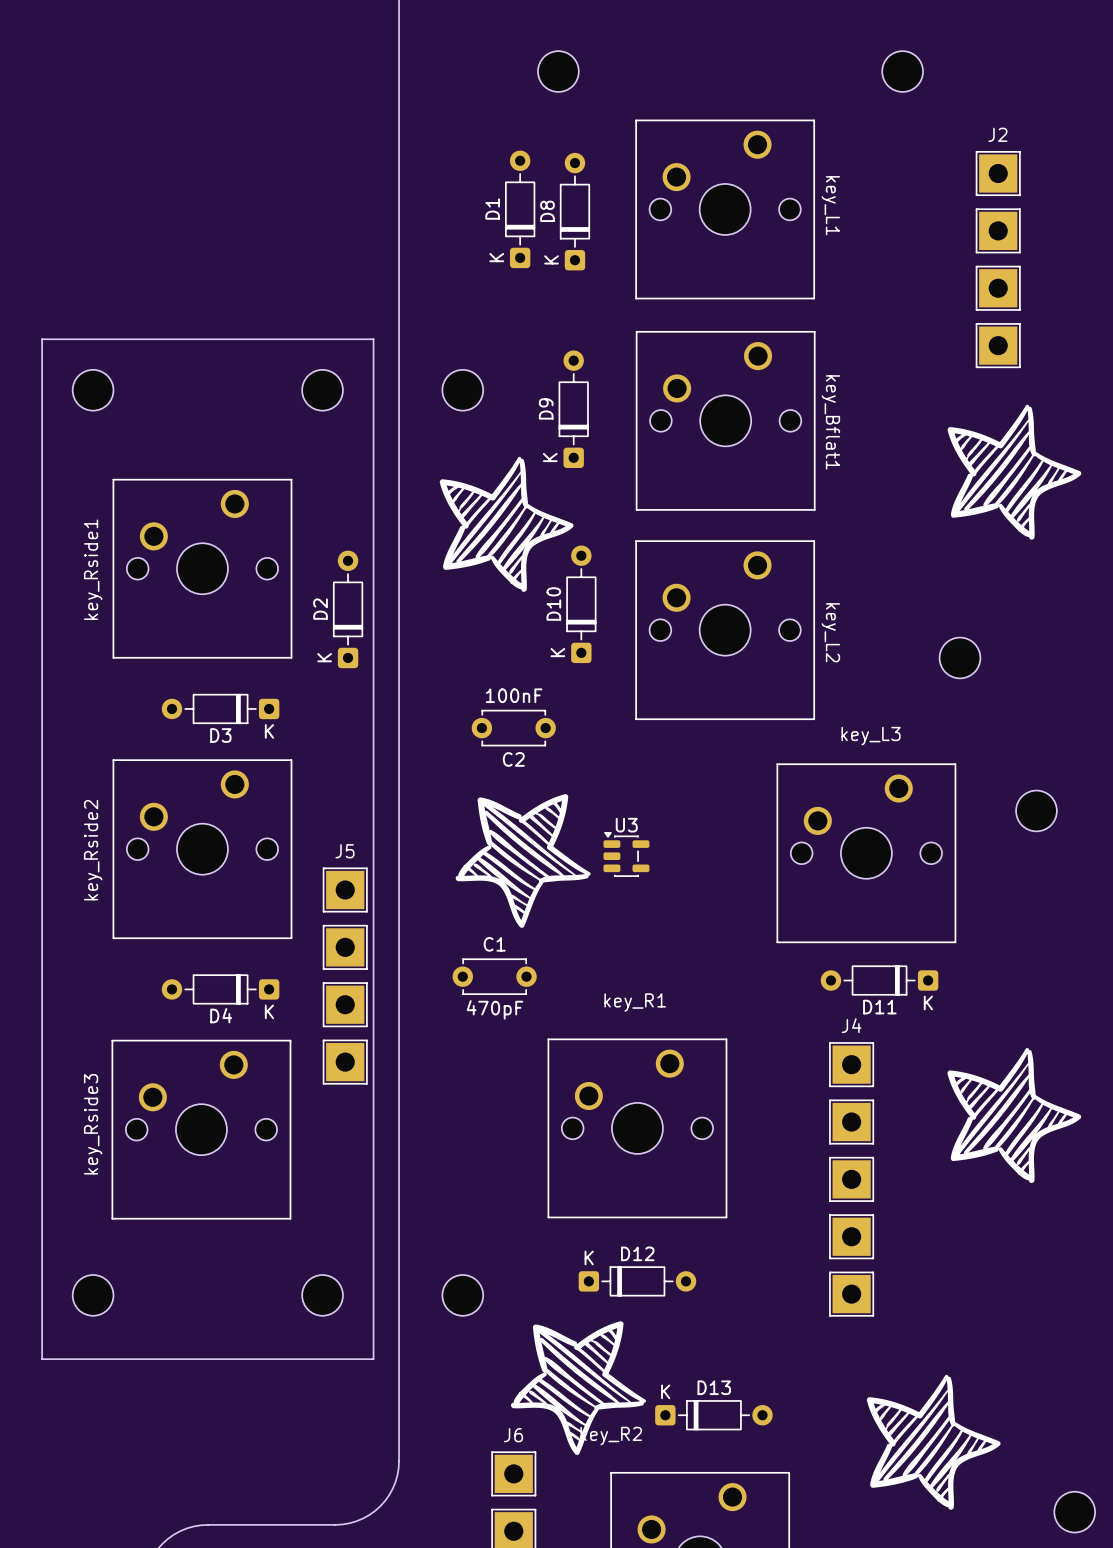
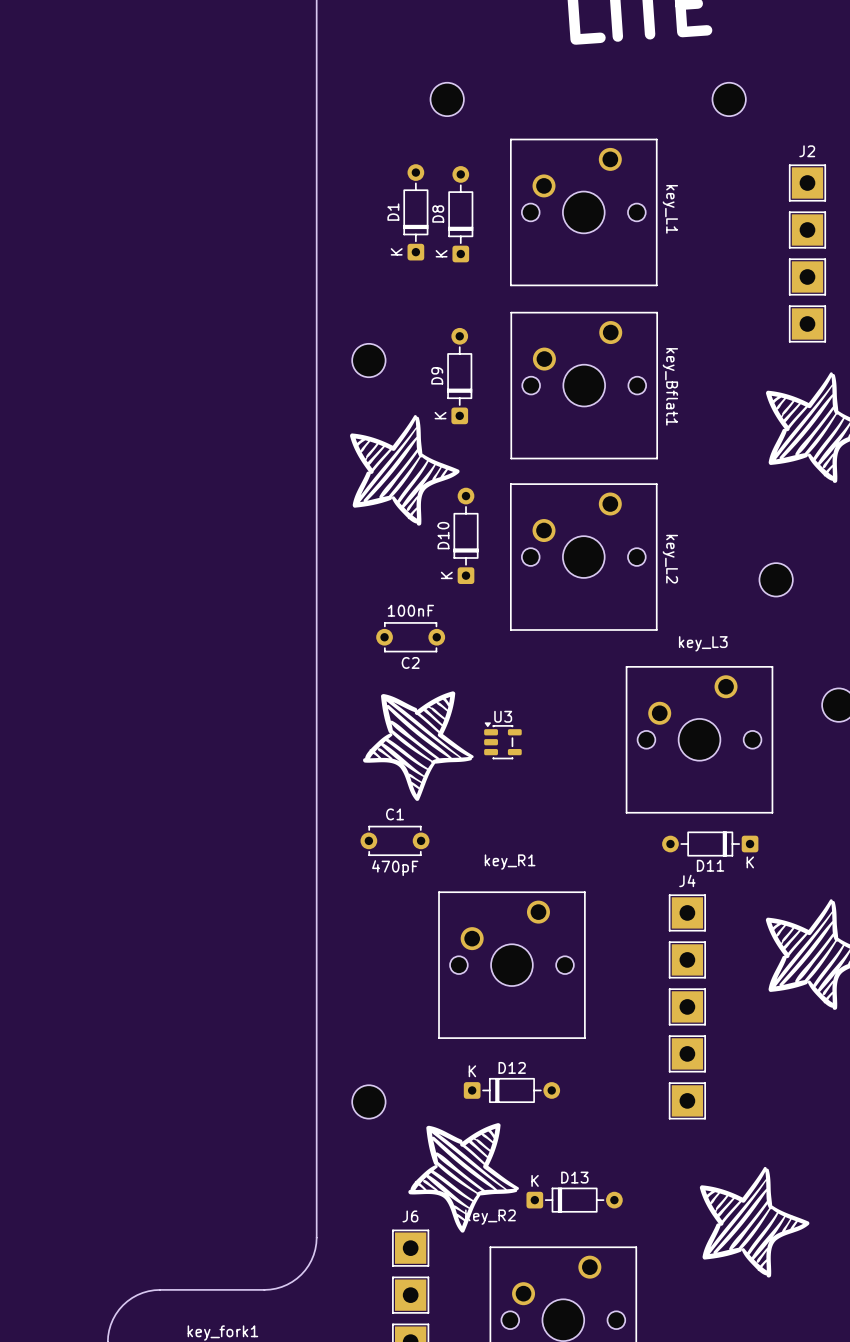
board edge: (42, 339) (373, 339) (373, 1359) (42, 1359) (42, 339) -> none
part: (93, 390) -> none
part: (322, 390) -> none
key_Rside1: (202, 568) -> none
D2: (348, 609) -> none
D3: (220, 708) -> none
key_Rside2: (202, 849) -> none
J5: (345, 976) -> none
D4: (220, 989) -> none
key_Rside3: (201, 1129) -> none
part: (93, 1295) -> none
part: (322, 1295) -> none

